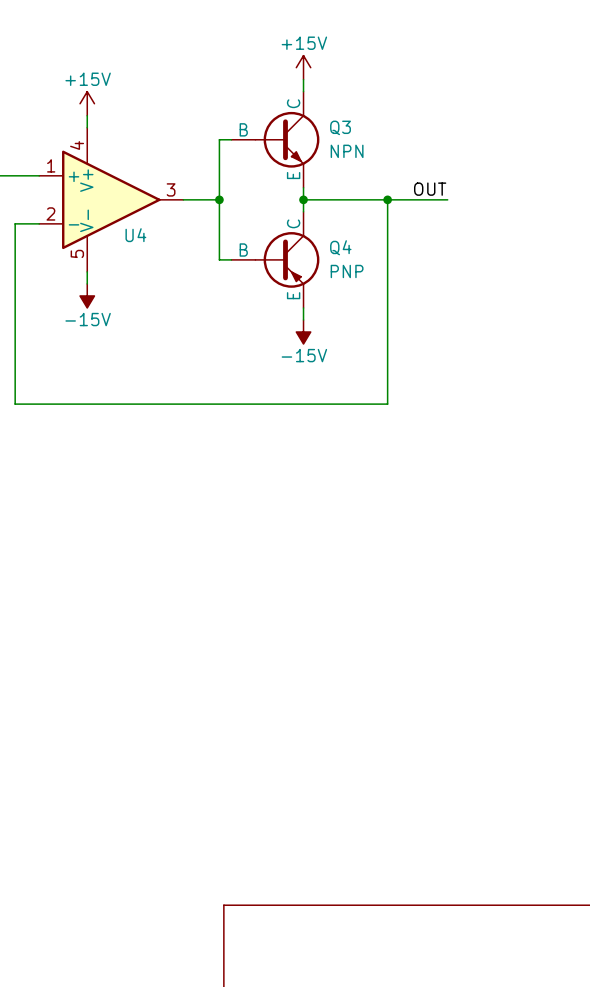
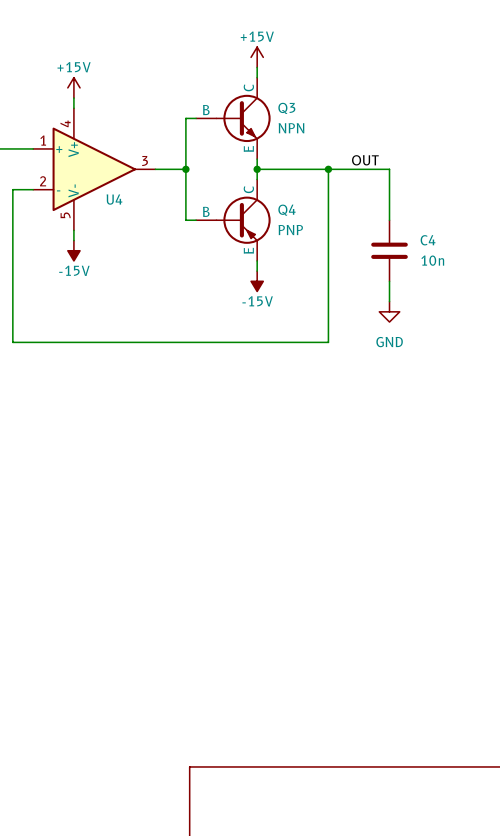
wire: none -> (379, 169) (389, 169) (389, 220)
C4: none -> 10n (389, 250)
wire: none -> (389, 281) (389, 301)
power symbol: none -> GND (389, 311)

